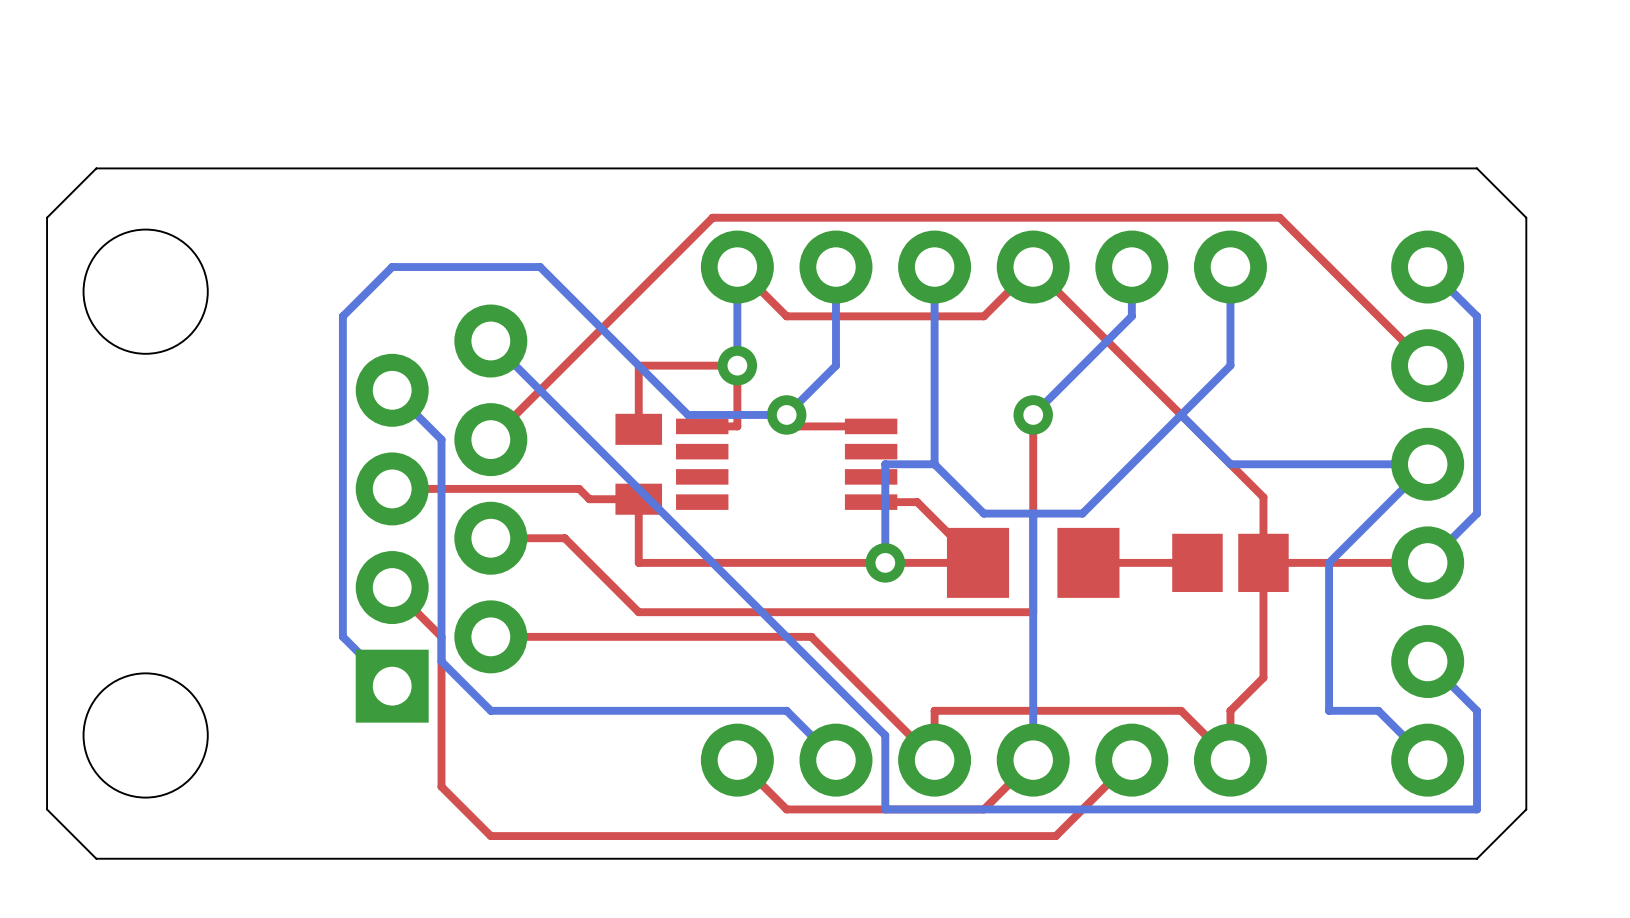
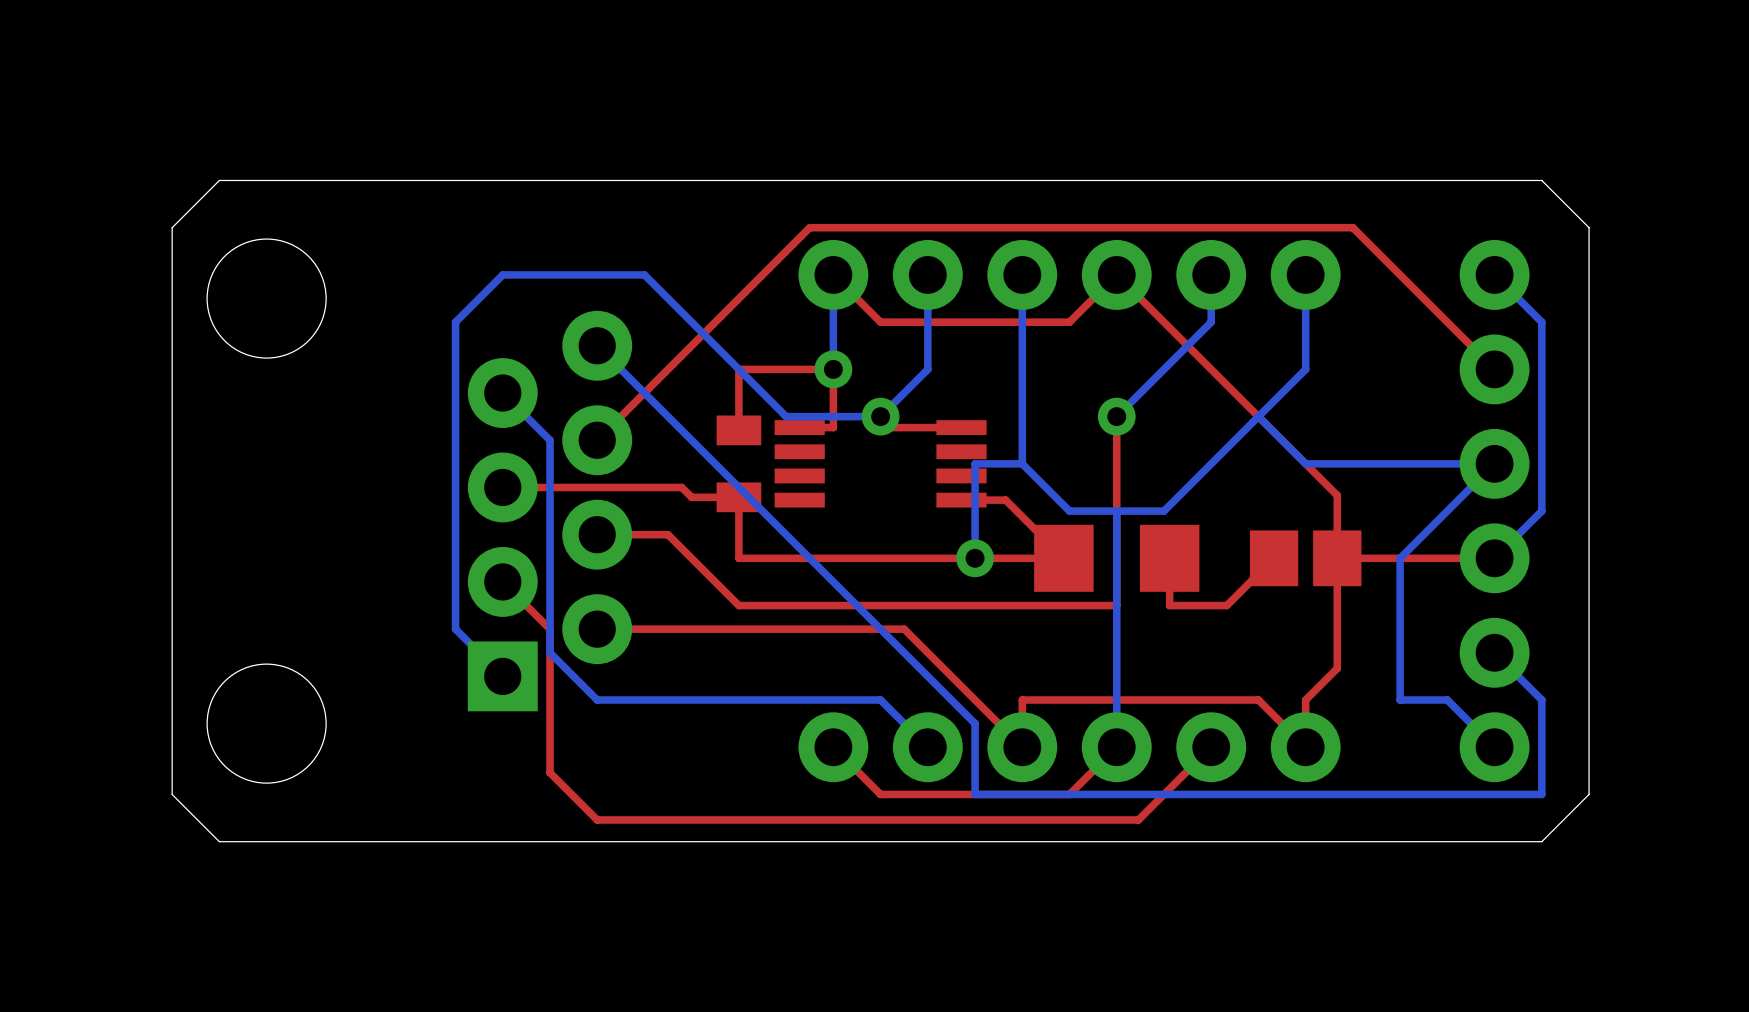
top track: (1197, 562) (1088, 562) -> (1274, 558) (1226, 605) (1169, 605) (1169, 558)

